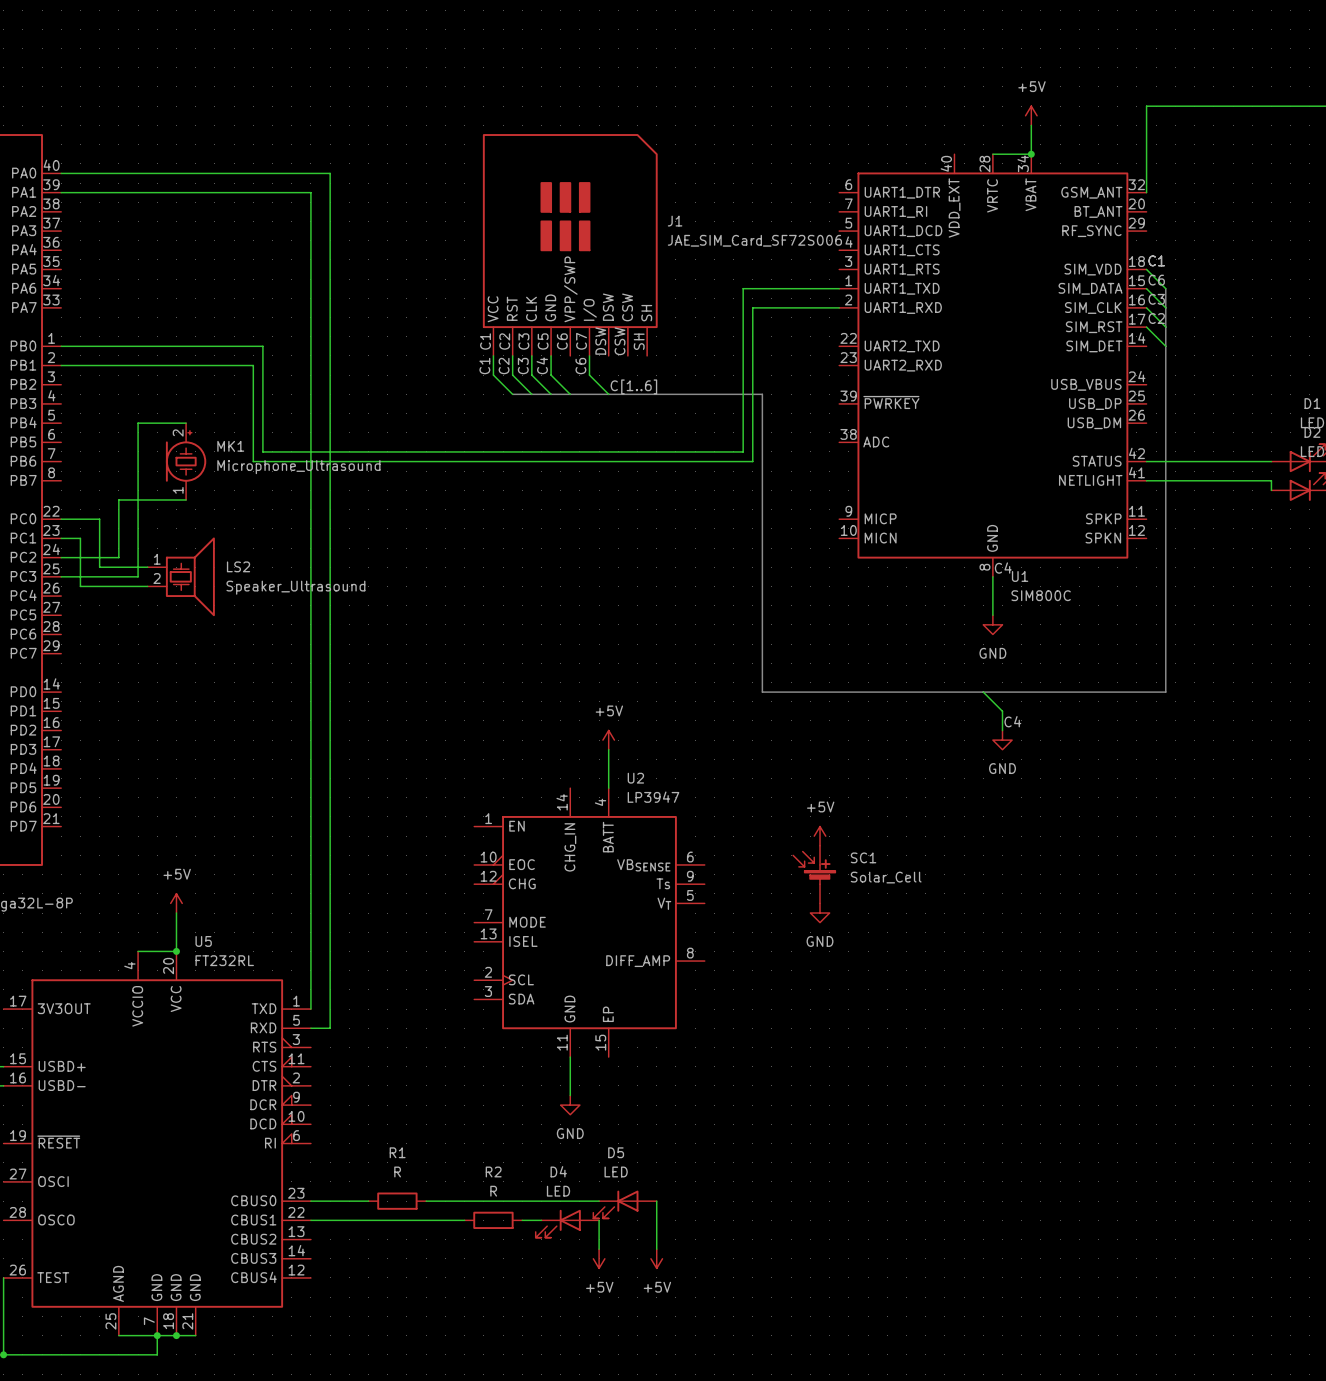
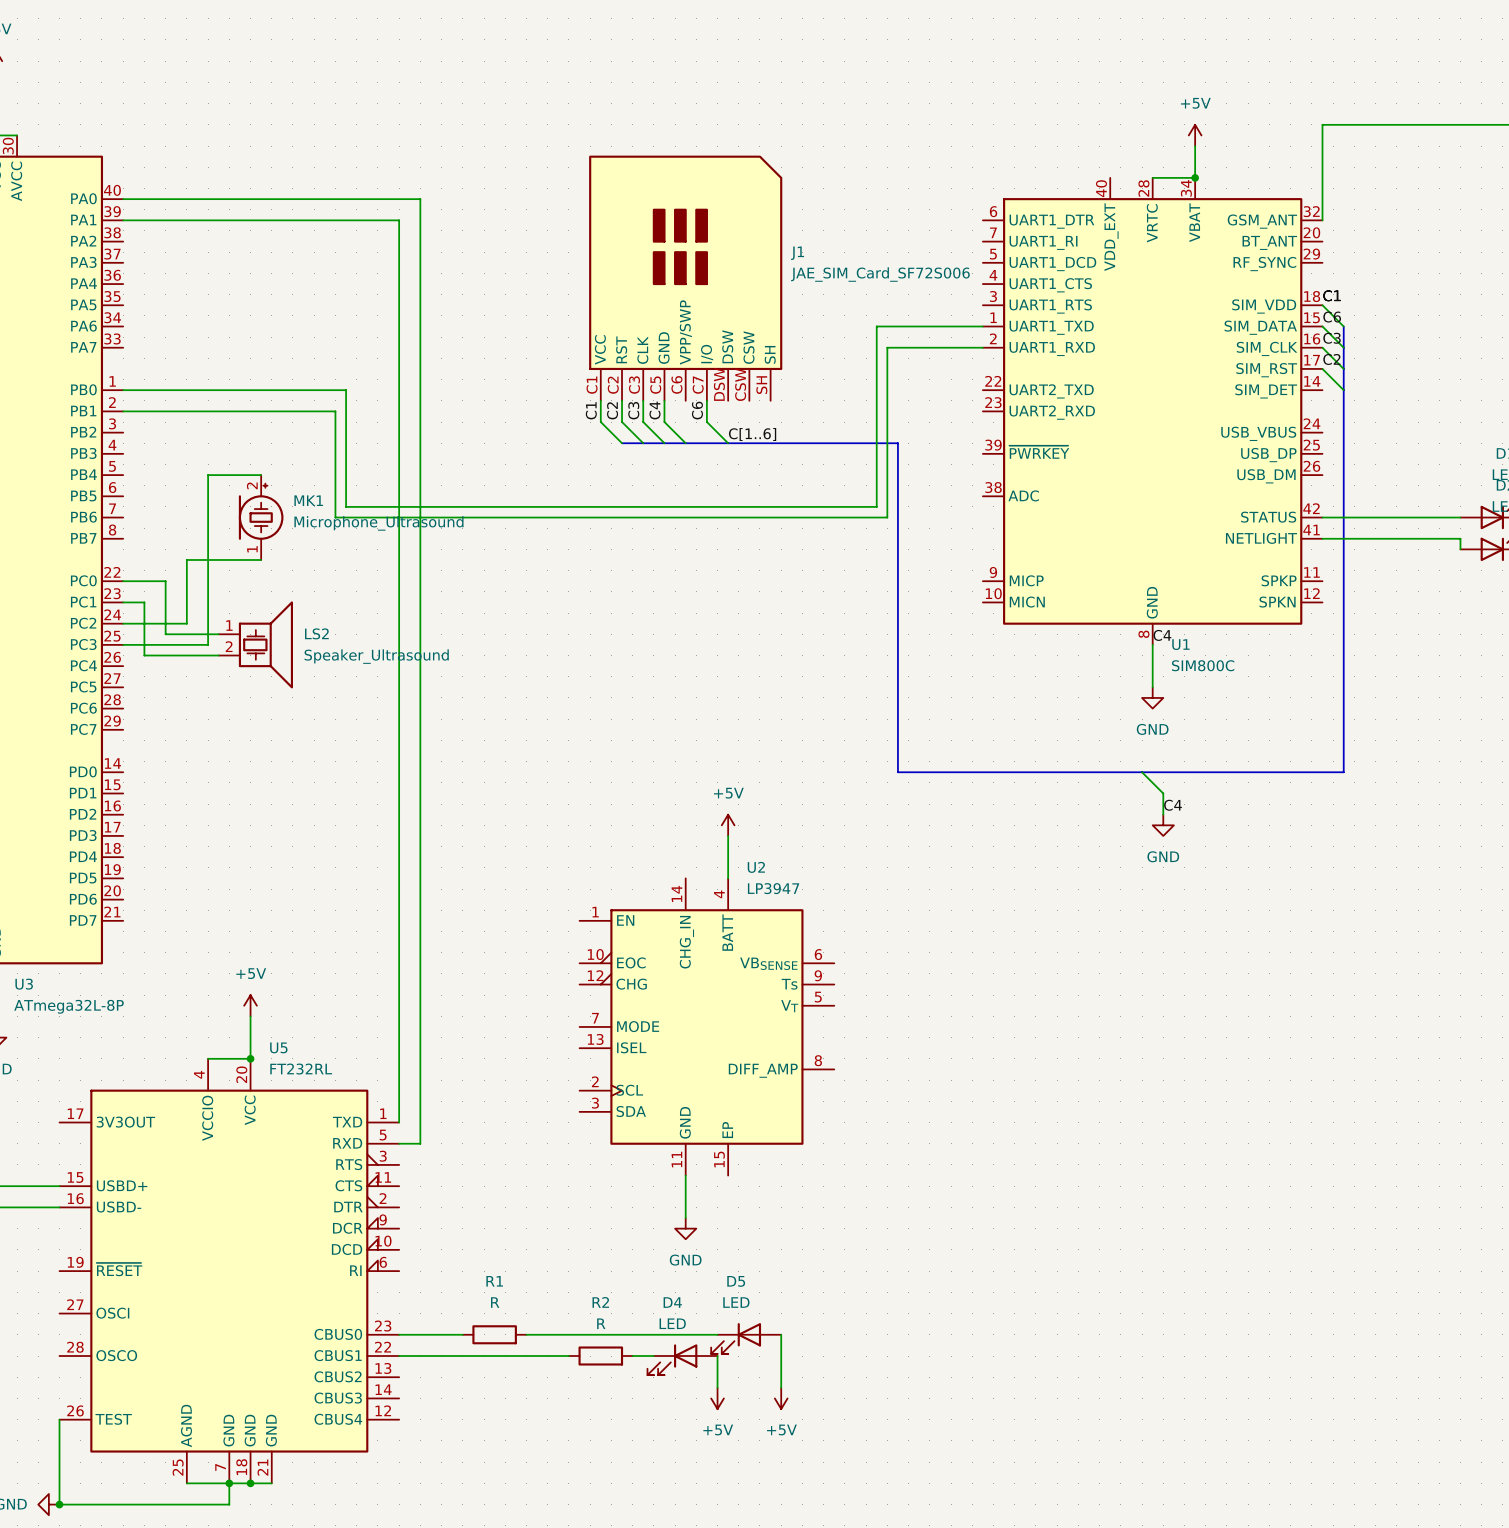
power symbol: +5V (820, 836) -> none
SC1: Solar_Cell (814, 874) -> none
power symbol: GND (820, 913) -> none

